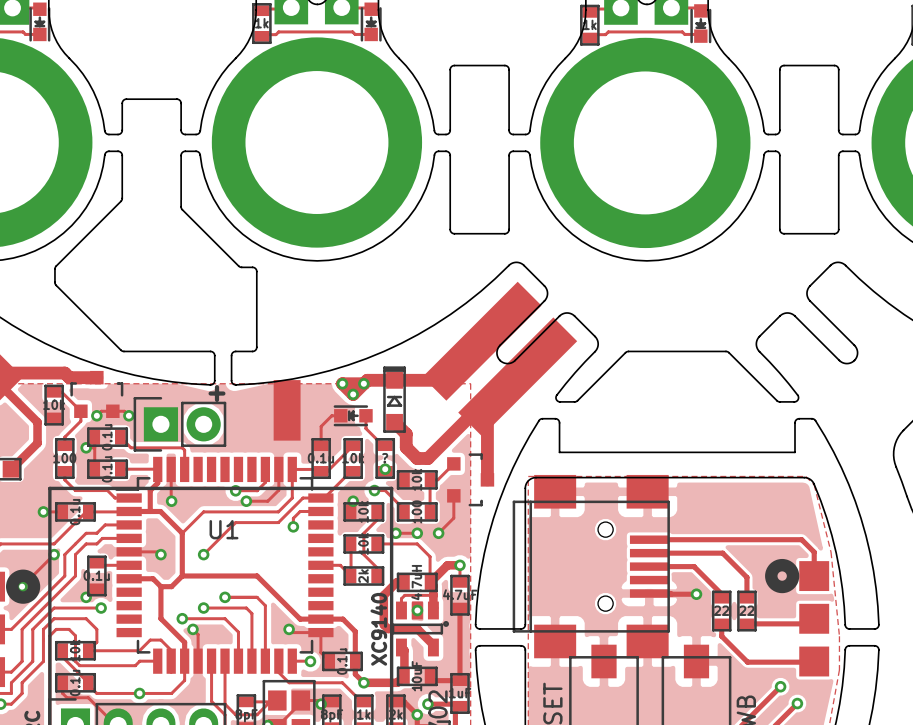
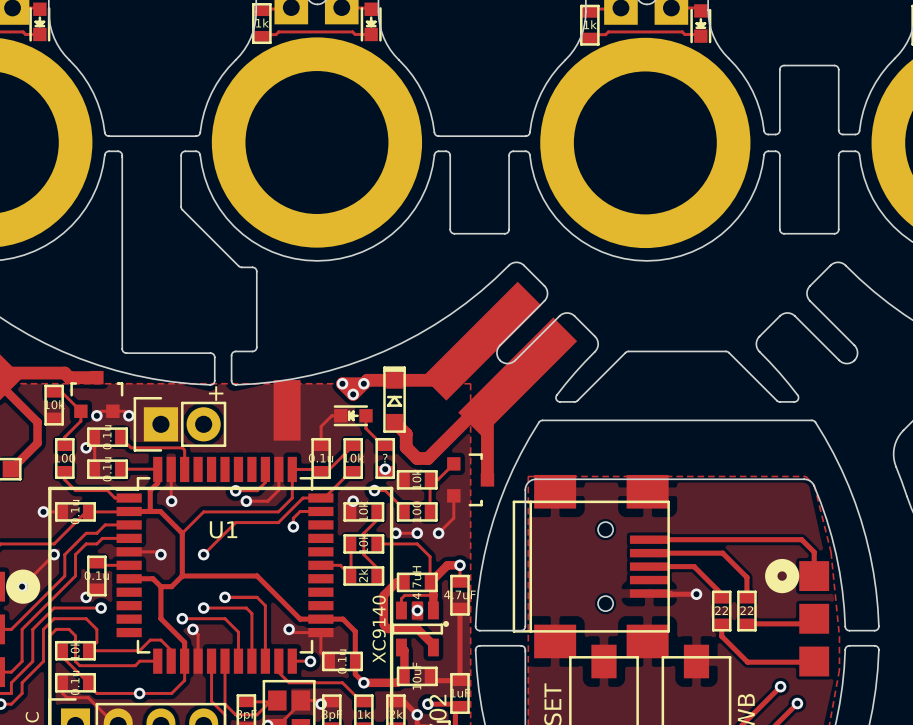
board edge: (48, 9) (54, 36) (60, 48) (88, 82) (100, 110) (105, 131) (108, 134) (118, 134) (121, 132) (122, 102) (126, 99) (178, 99) (181, 102) (181, 132) (185, 134) (198, 133) (204, 110) (211, 91) (222, 73) (244, 48) (250, 36) (256, 9) -> (48, 9) (50, 25) (54, 37) (60, 49) (88, 84) (100, 112) (105, 133) (108, 136) (198, 135) (204, 112) (211, 93) (222, 75) (244, 49) (250, 37) (254, 25) (256, 9)
board edge: (378, 9) (383, 36) (390, 48) (418, 82) (430, 110) (434, 131) (438, 134) (447, 134) (450, 131) (450, 69) (454, 65) (507, 66) (509, 131) (512, 134) (528, 133) (533, 110) (541, 91) (551, 73) (574, 48) (580, 36) (585, 9) -> (378, 9) (379, 25) (383, 37) (390, 49) (418, 84) (430, 112) (434, 133) (438, 136) (528, 135) (533, 112) (541, 93) (551, 75) (574, 49) (580, 37) (584, 25) (585, 9)
board edge: (122, 198) (55, 266) (55, 284) (122, 351) (211, 351) (214, 353) (214, 357) -> (122, 198) (122, 351) (126, 353) (211, 353) (214, 357)
board edge: (525, 489) (527, 481) (536, 477) (807, 478) (814, 484) (831, 535) (839, 570) (845, 626) (848, 628) (874, 628) (878, 624) (873, 570) (861, 518) (841, 467) (813, 419) (798, 418) (795, 420) (794, 452) (559, 452) (558, 420) (555, 418) (542, 418) (539, 420) (520, 451) (499, 501) (484, 553) (476, 606) (475, 625) (478, 628) (521, 628) (525, 624) -> (525, 489) (528, 482) (536, 479) (807, 479) (814, 485) (831, 537) (839, 572) (845, 628) (848, 630) (874, 630) (878, 626) (873, 572) (861, 520) (841, 469) (824, 437) (815, 421) (811, 420) (540, 421) (520, 453) (499, 502) (484, 554) (476, 608) (475, 626) (478, 630) (521, 630) (524, 628) (525, 624)

